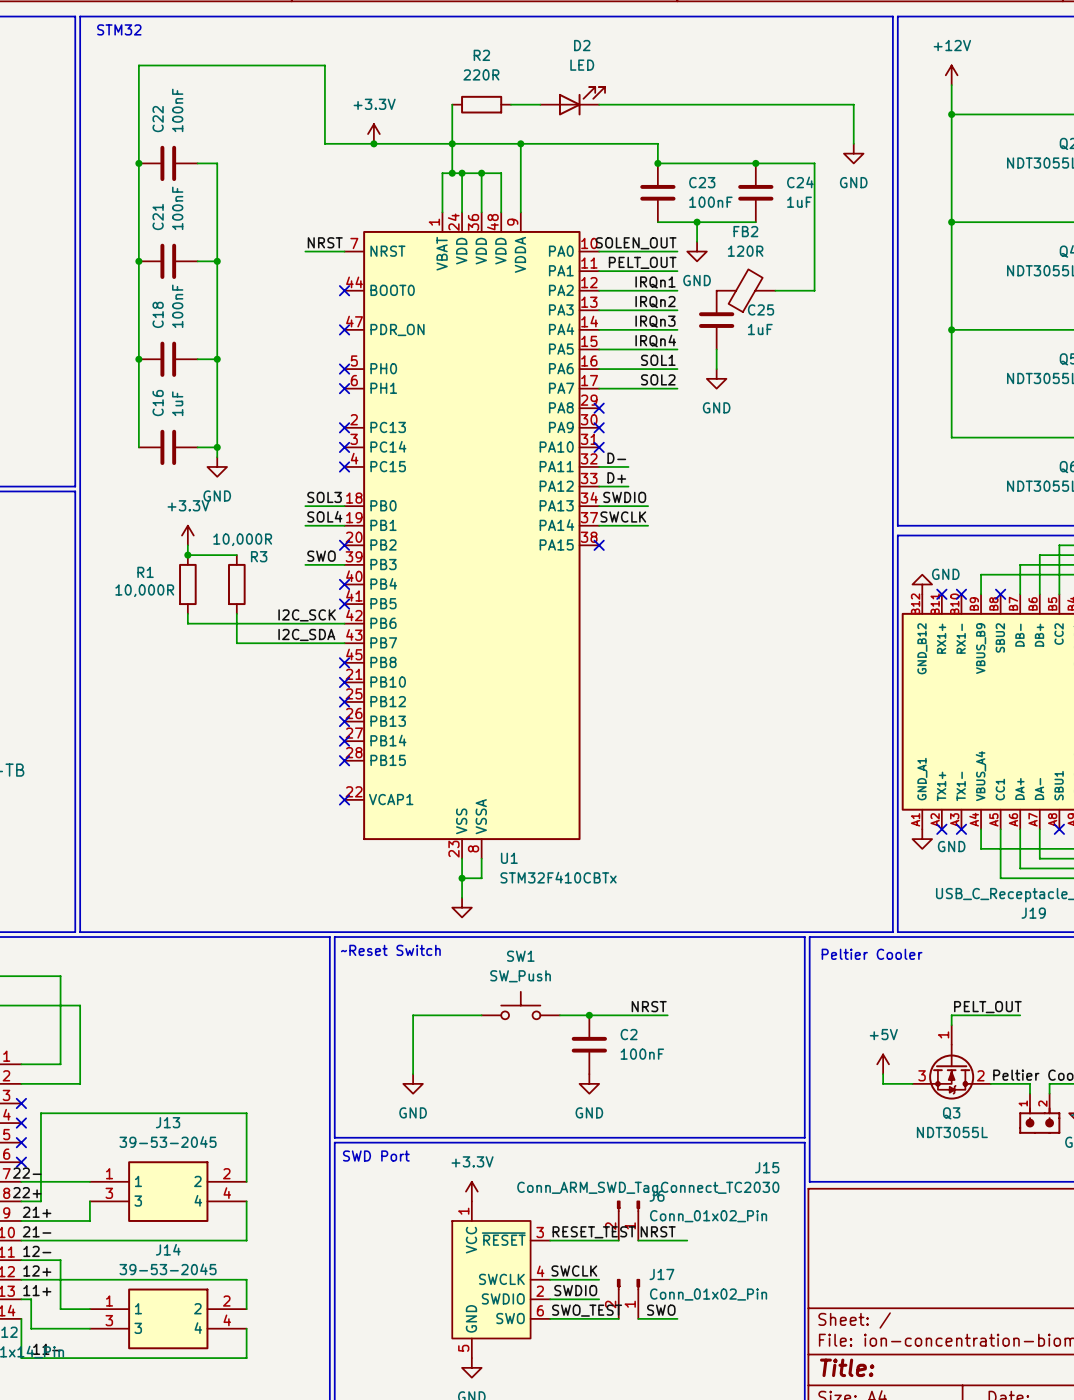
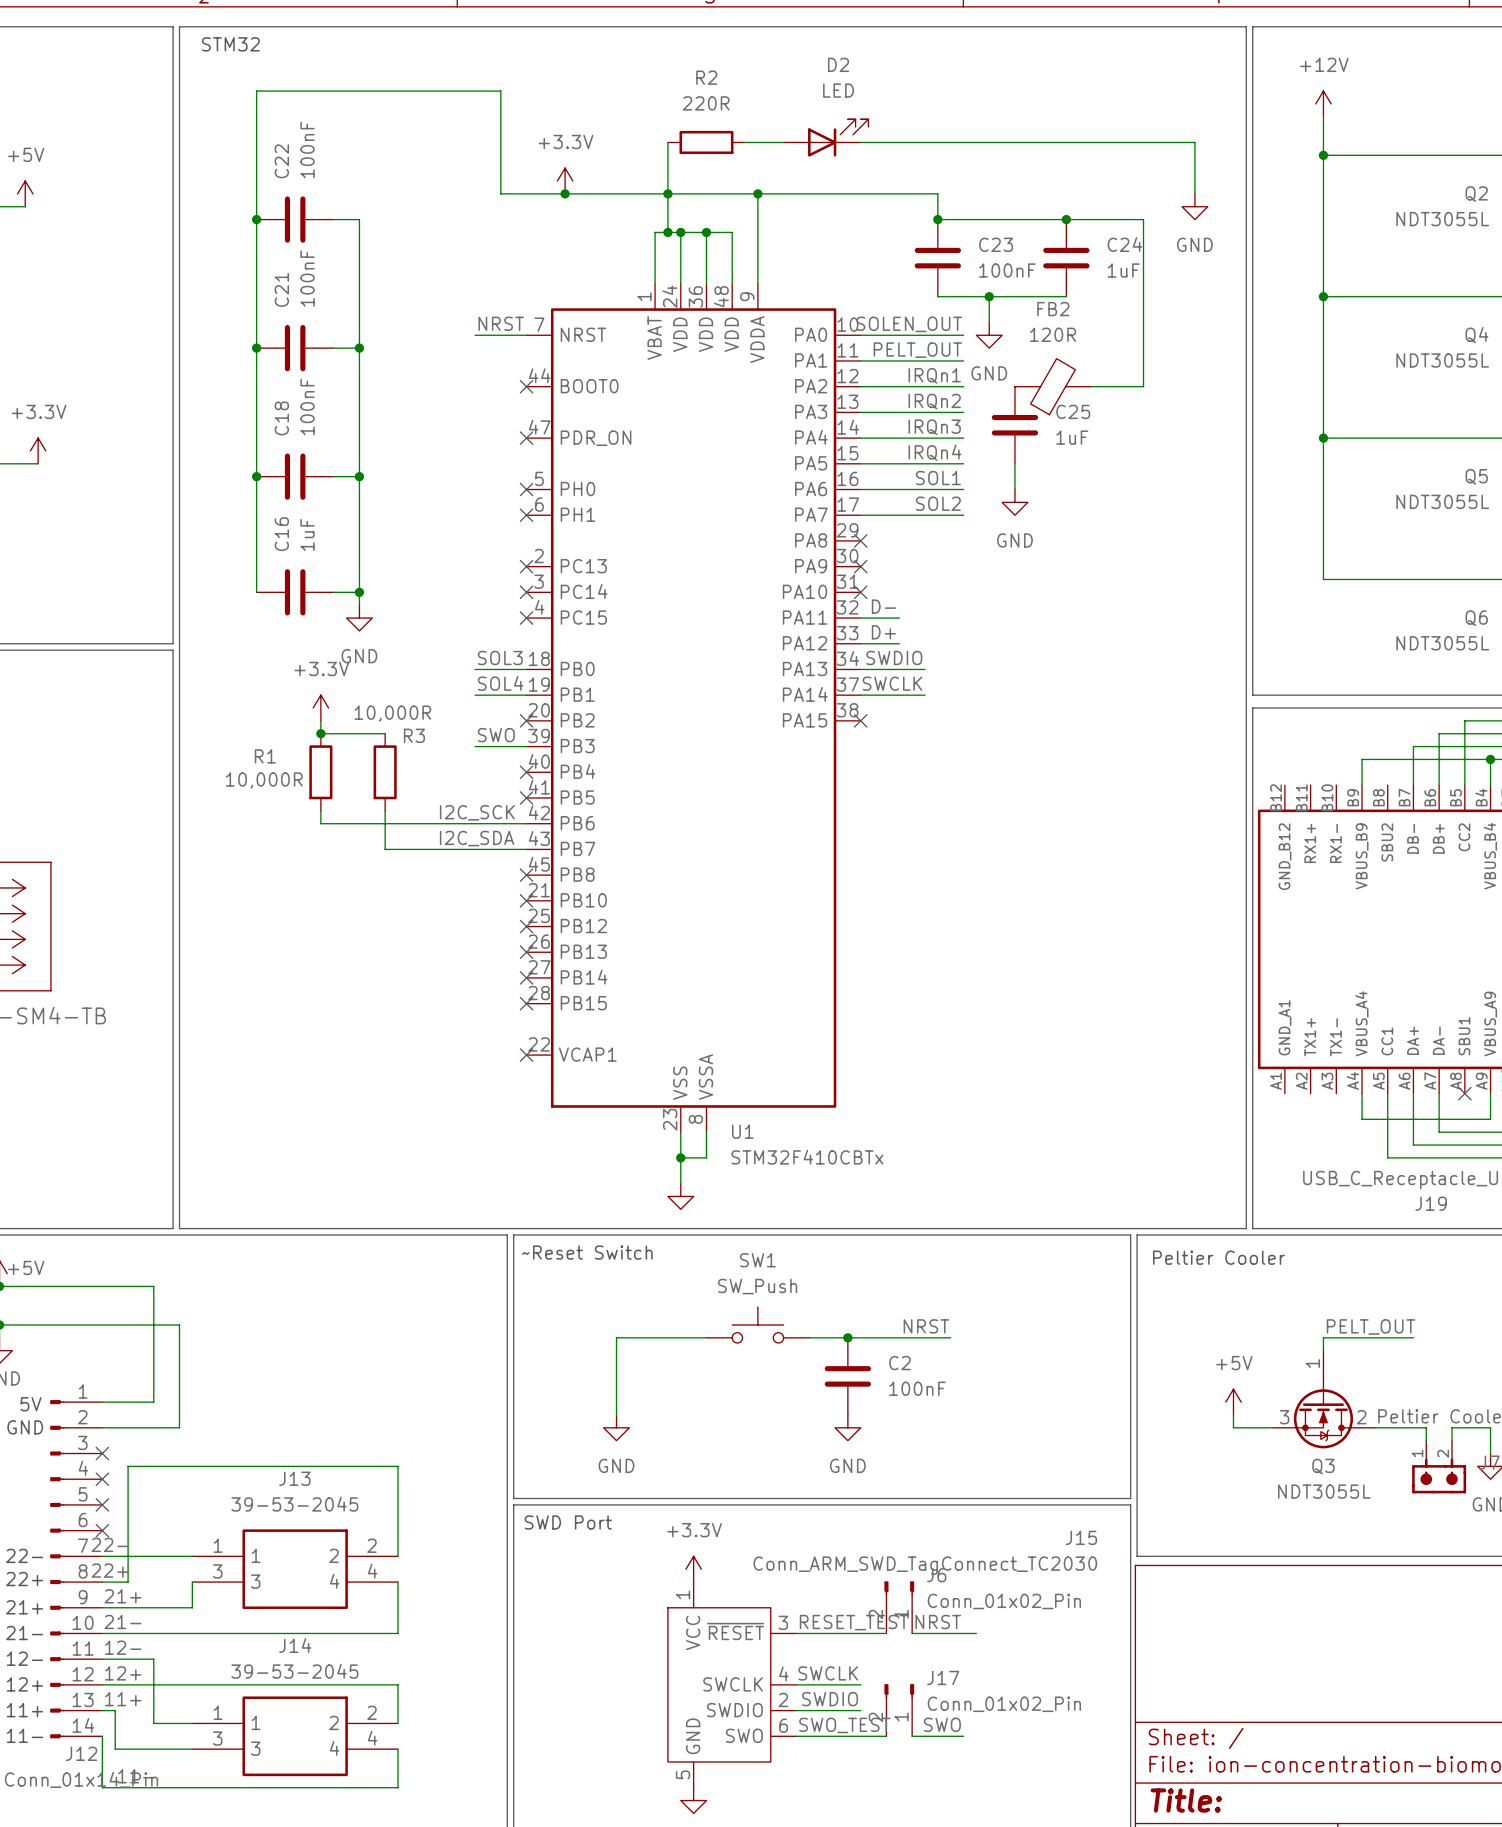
power symbol: GND (922, 584) -> none
no-connect mark: (941, 594) -> none
no-connect mark: (961, 594) -> none
no-connect mark: (1000, 594) -> none
no-connect mark: (941, 829) -> none
no-connect mark: (961, 829) -> none
power symbol: GND (922, 839) -> none

